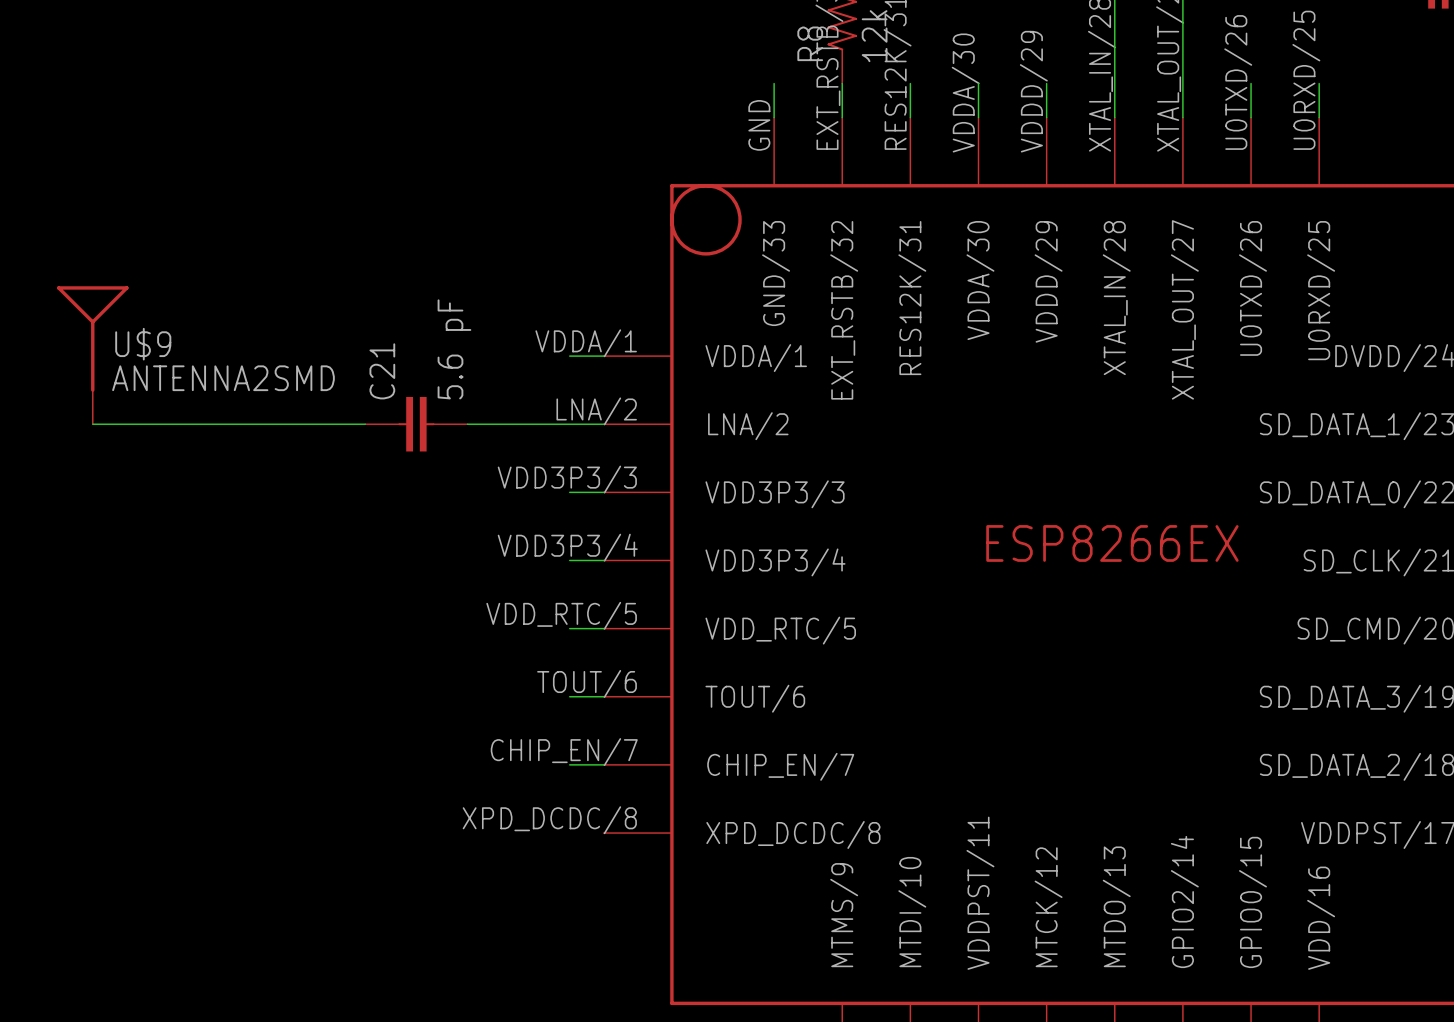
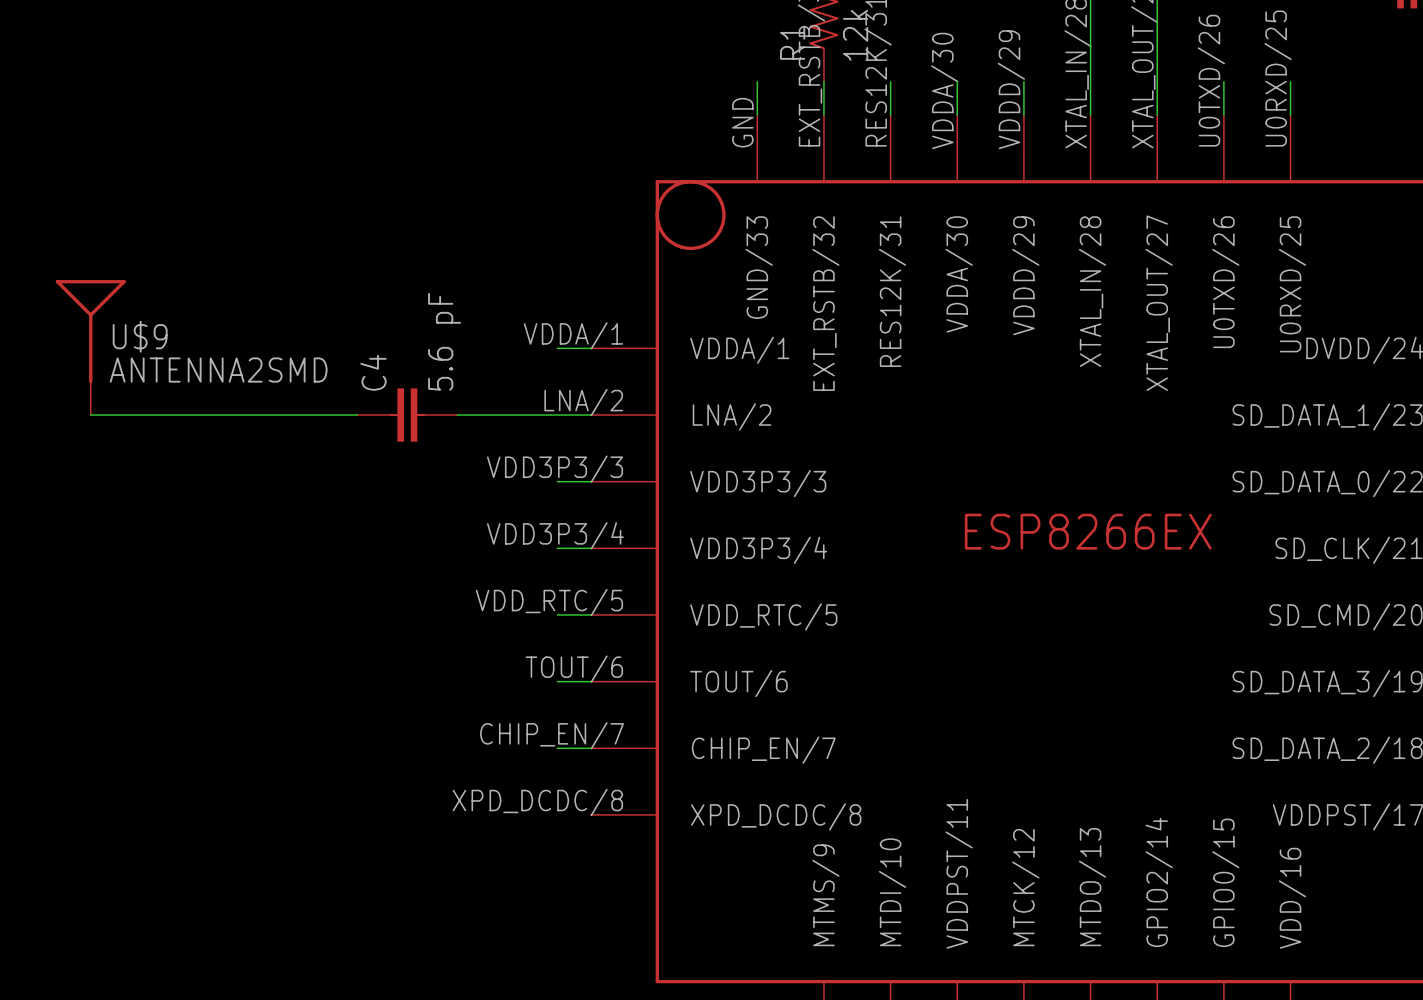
R8 name: R8 (810, 43) -> R1 (792, 42)
C21 name: C21 (382, 371) -> C4 (373, 372)

